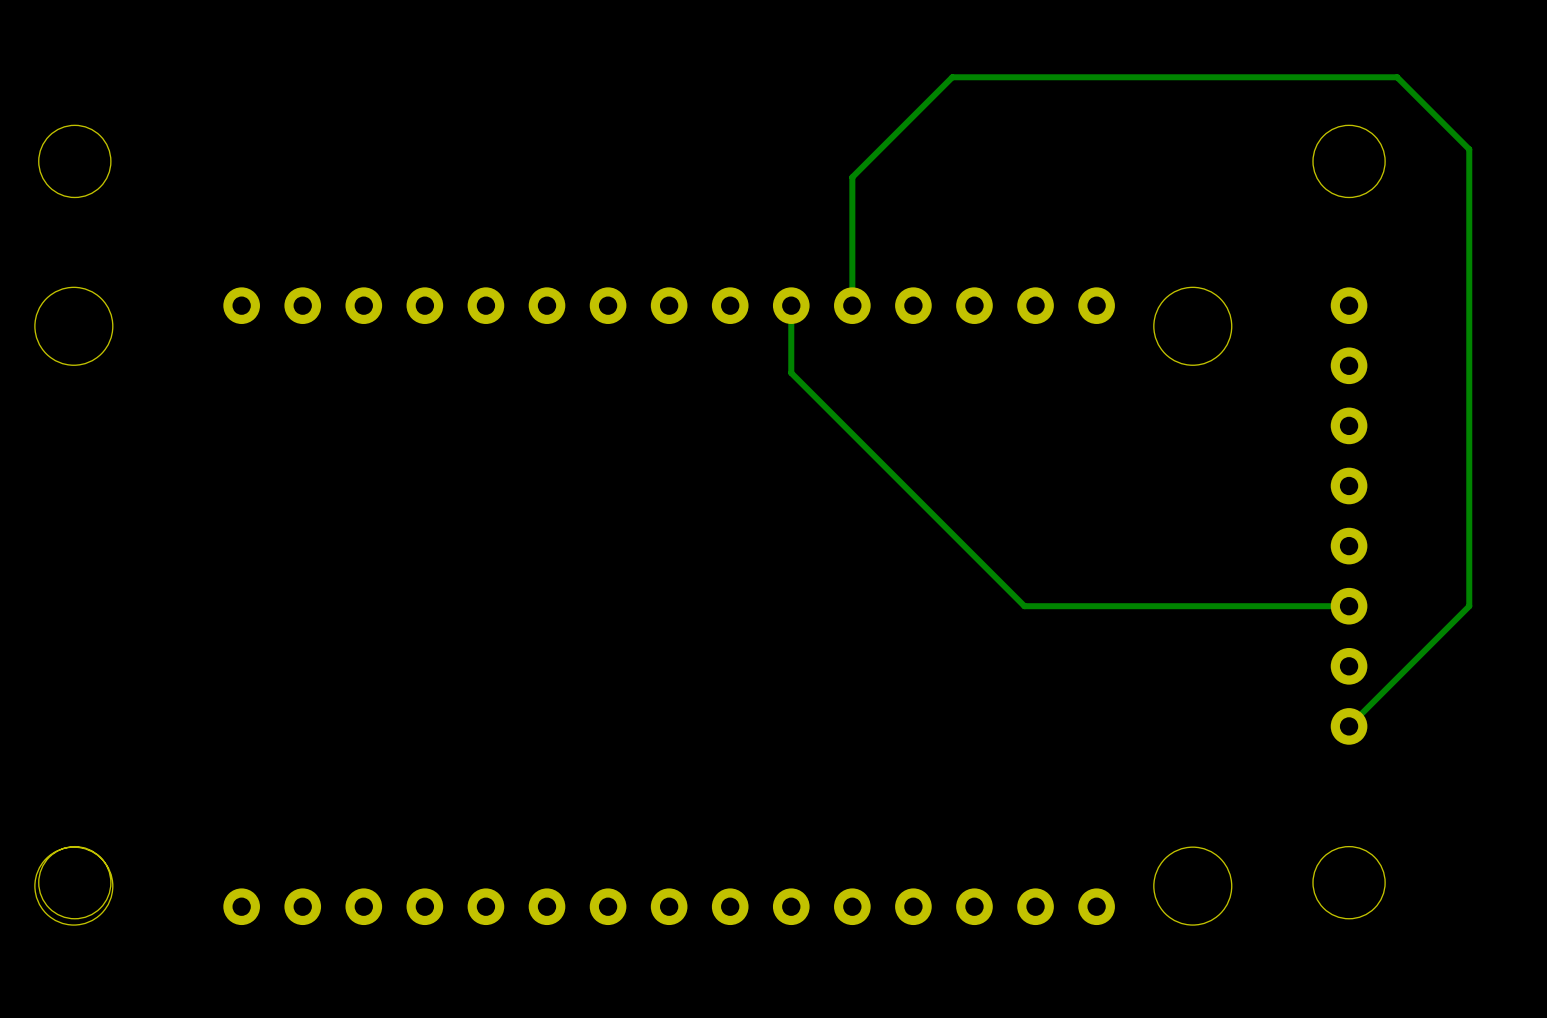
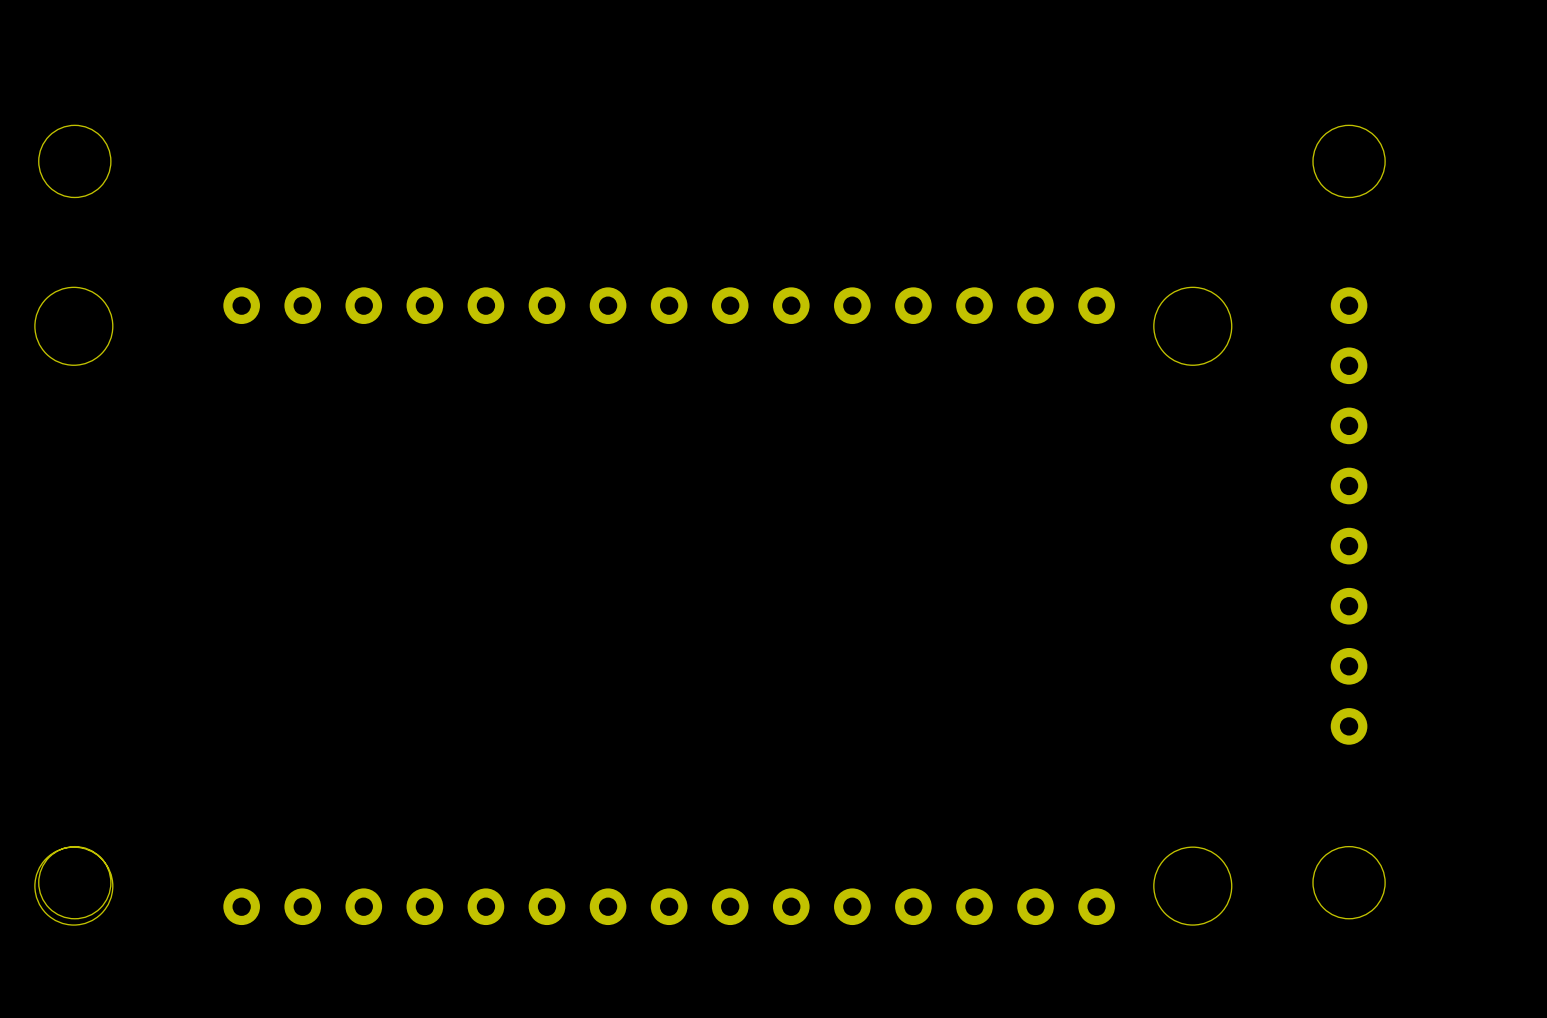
track: (791, 305) (791, 372) (1024, 606) (1349, 606) -> none
track: (852, 305) (852, 177) (952, 77) (1397, 77) (1469, 149) (1469, 606) (1349, 726) -> none

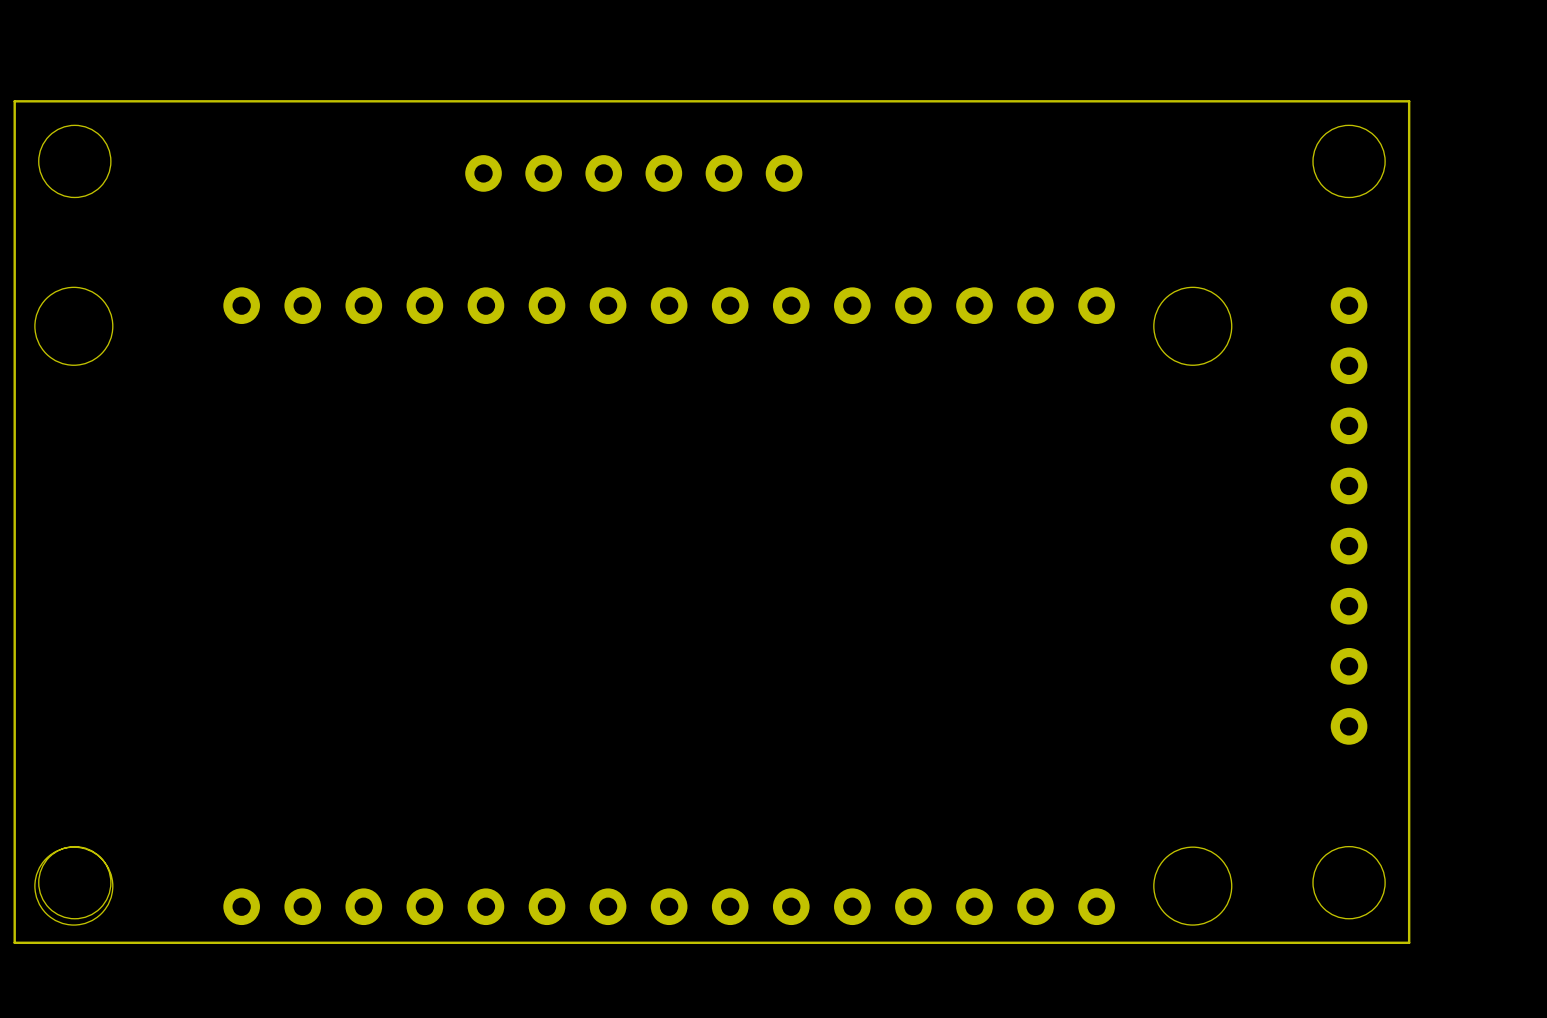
board edge: none -> (1409, 101) (14, 101) (14, 942) (1409, 942) (1409, 101)
part: none -> (633, 173)

